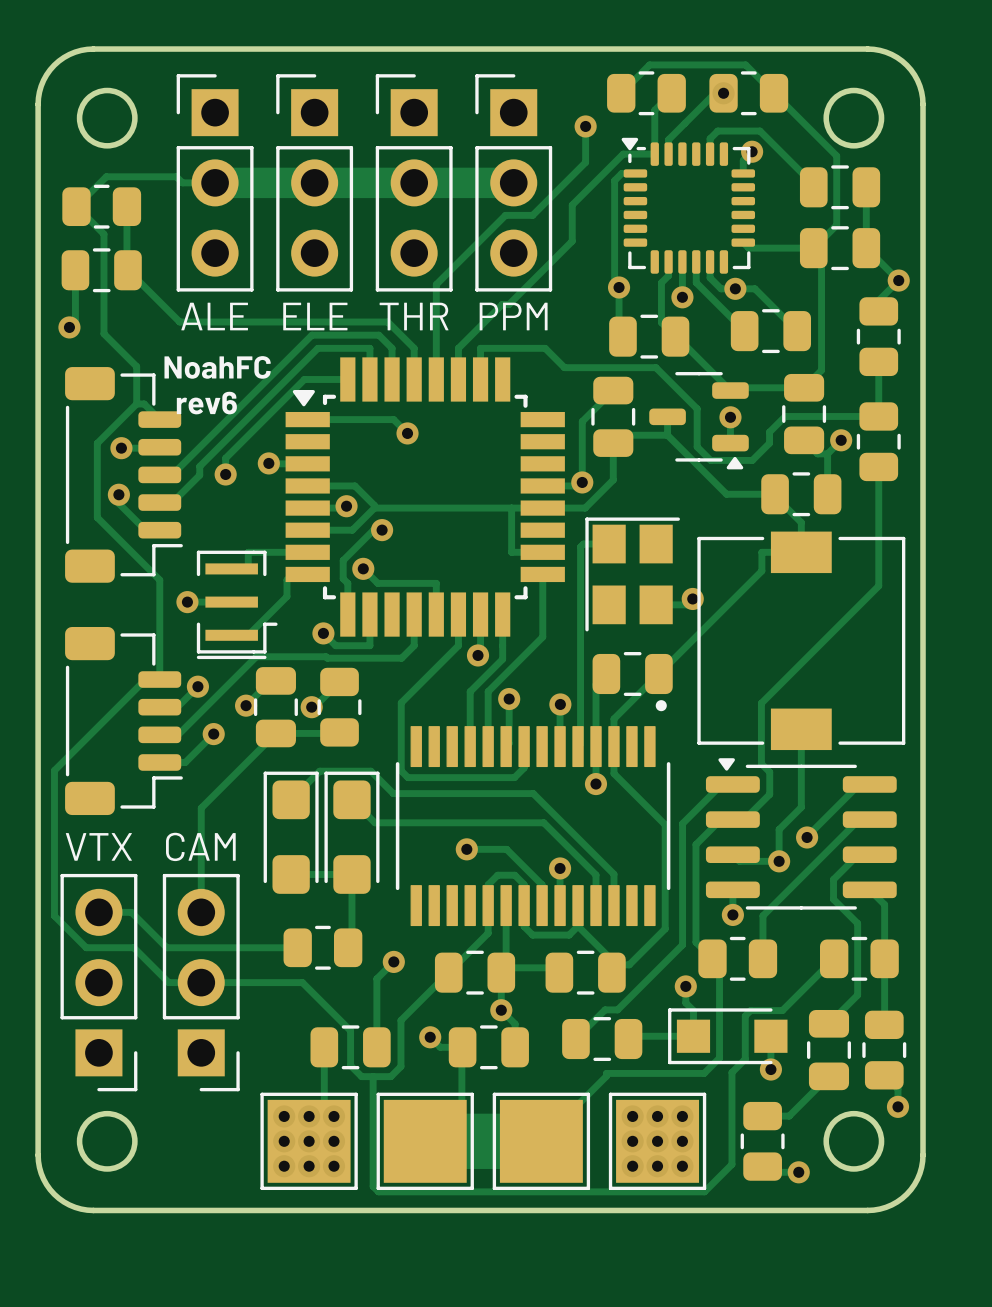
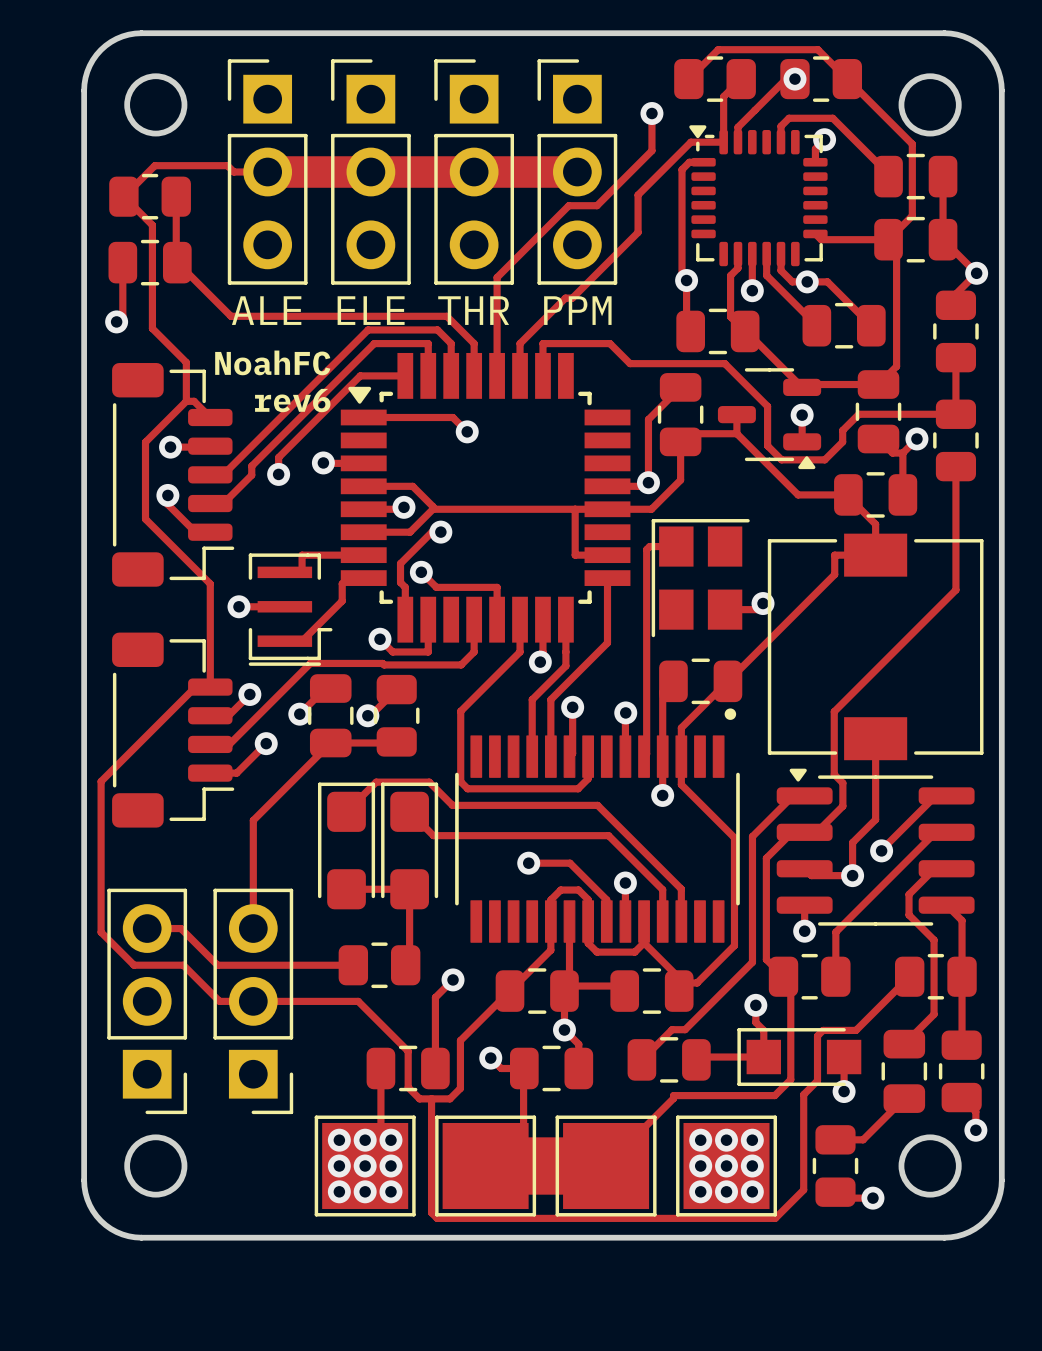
part value: VTX (98, 846) -> none
part value: CAM (200, 846) -> none

